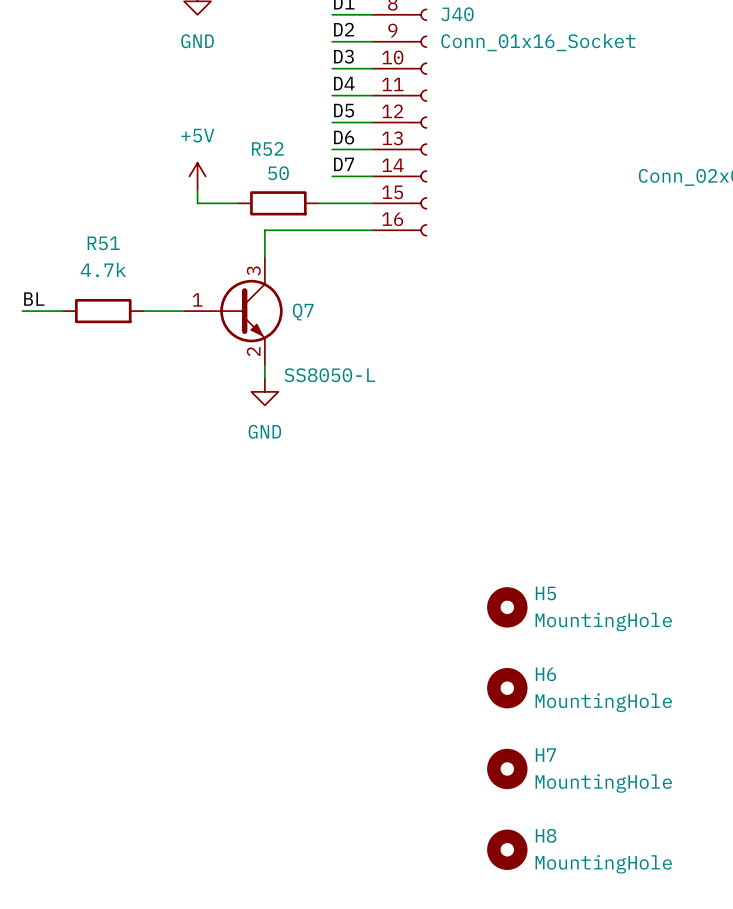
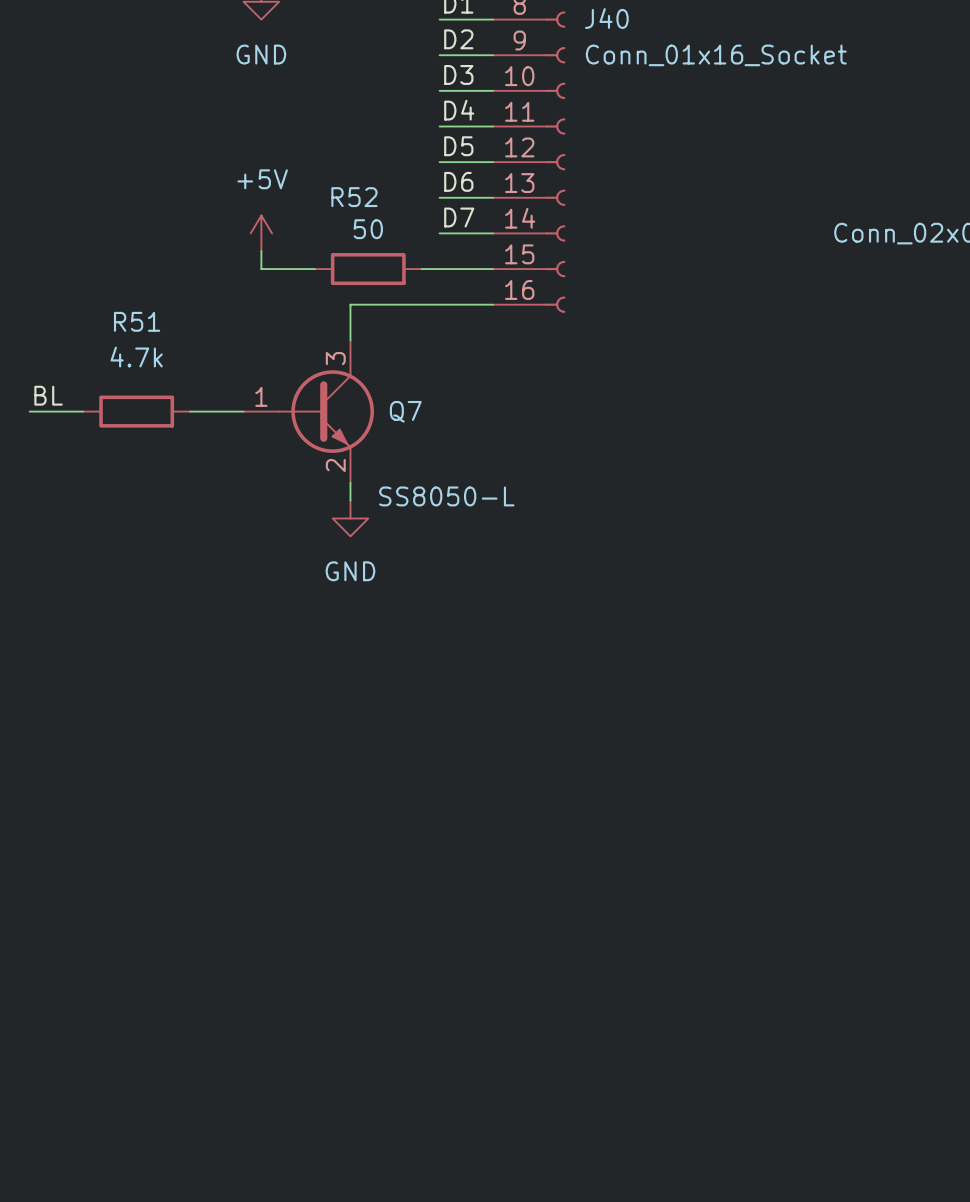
H5: MountingHole (507, 607) -> none
H6: MountingHole (507, 688) -> none
H7: MountingHole (507, 768) -> none
H8: MountingHole (507, 849) -> none

